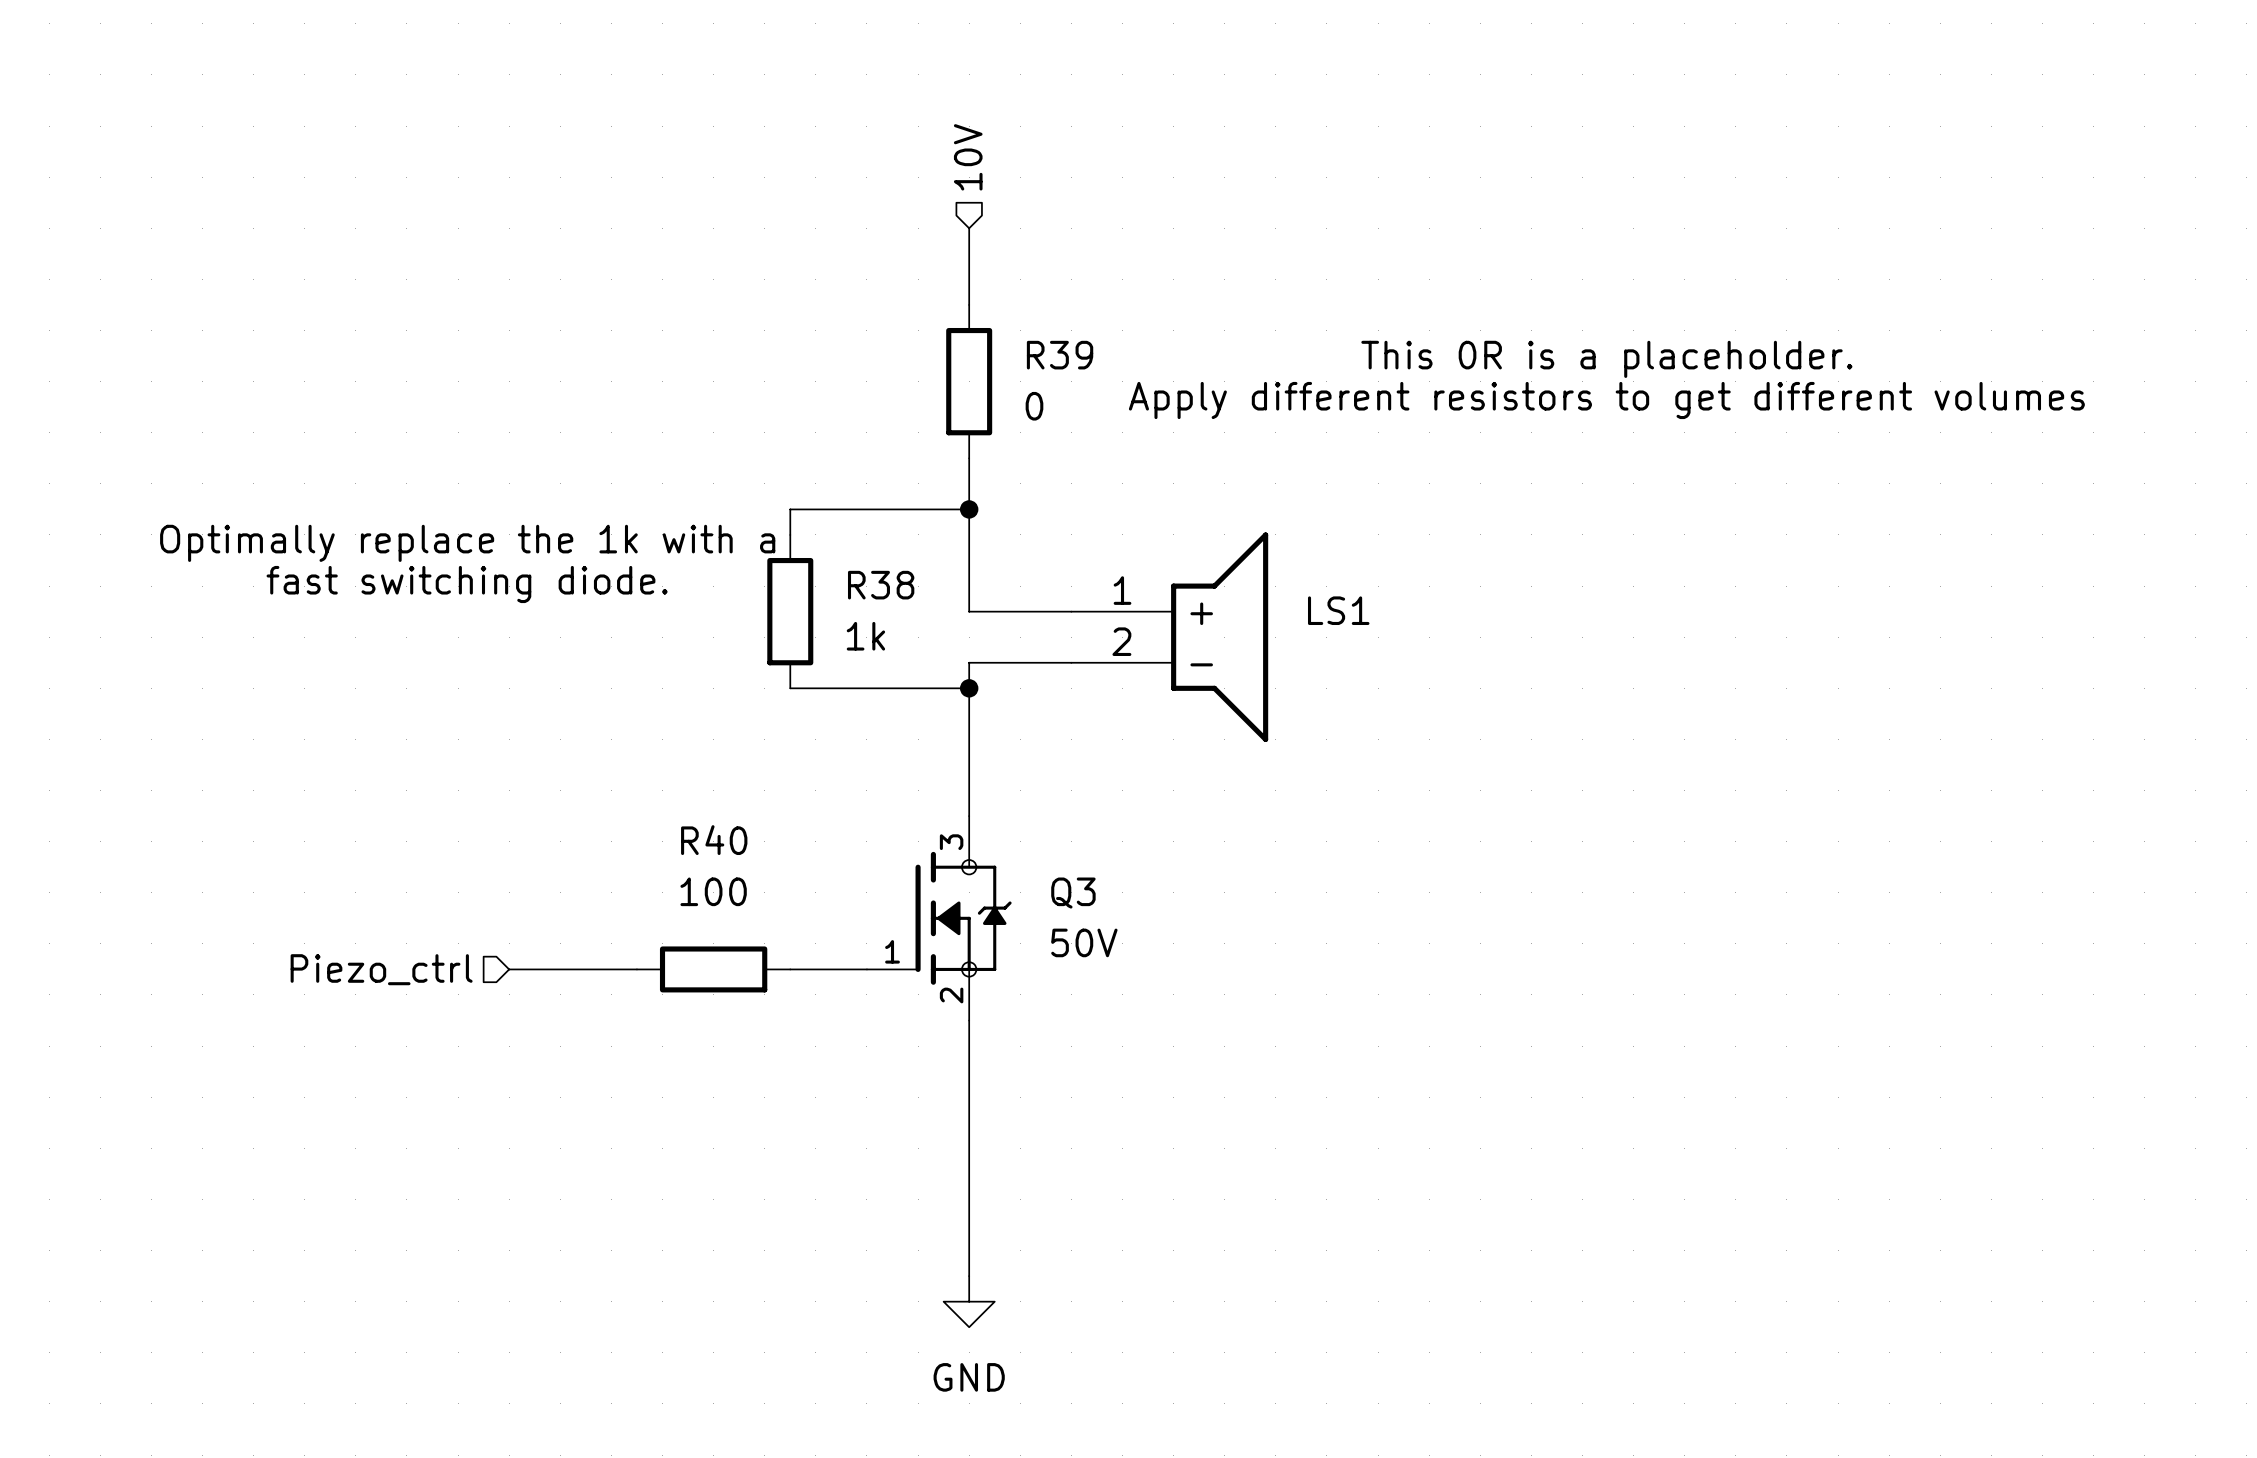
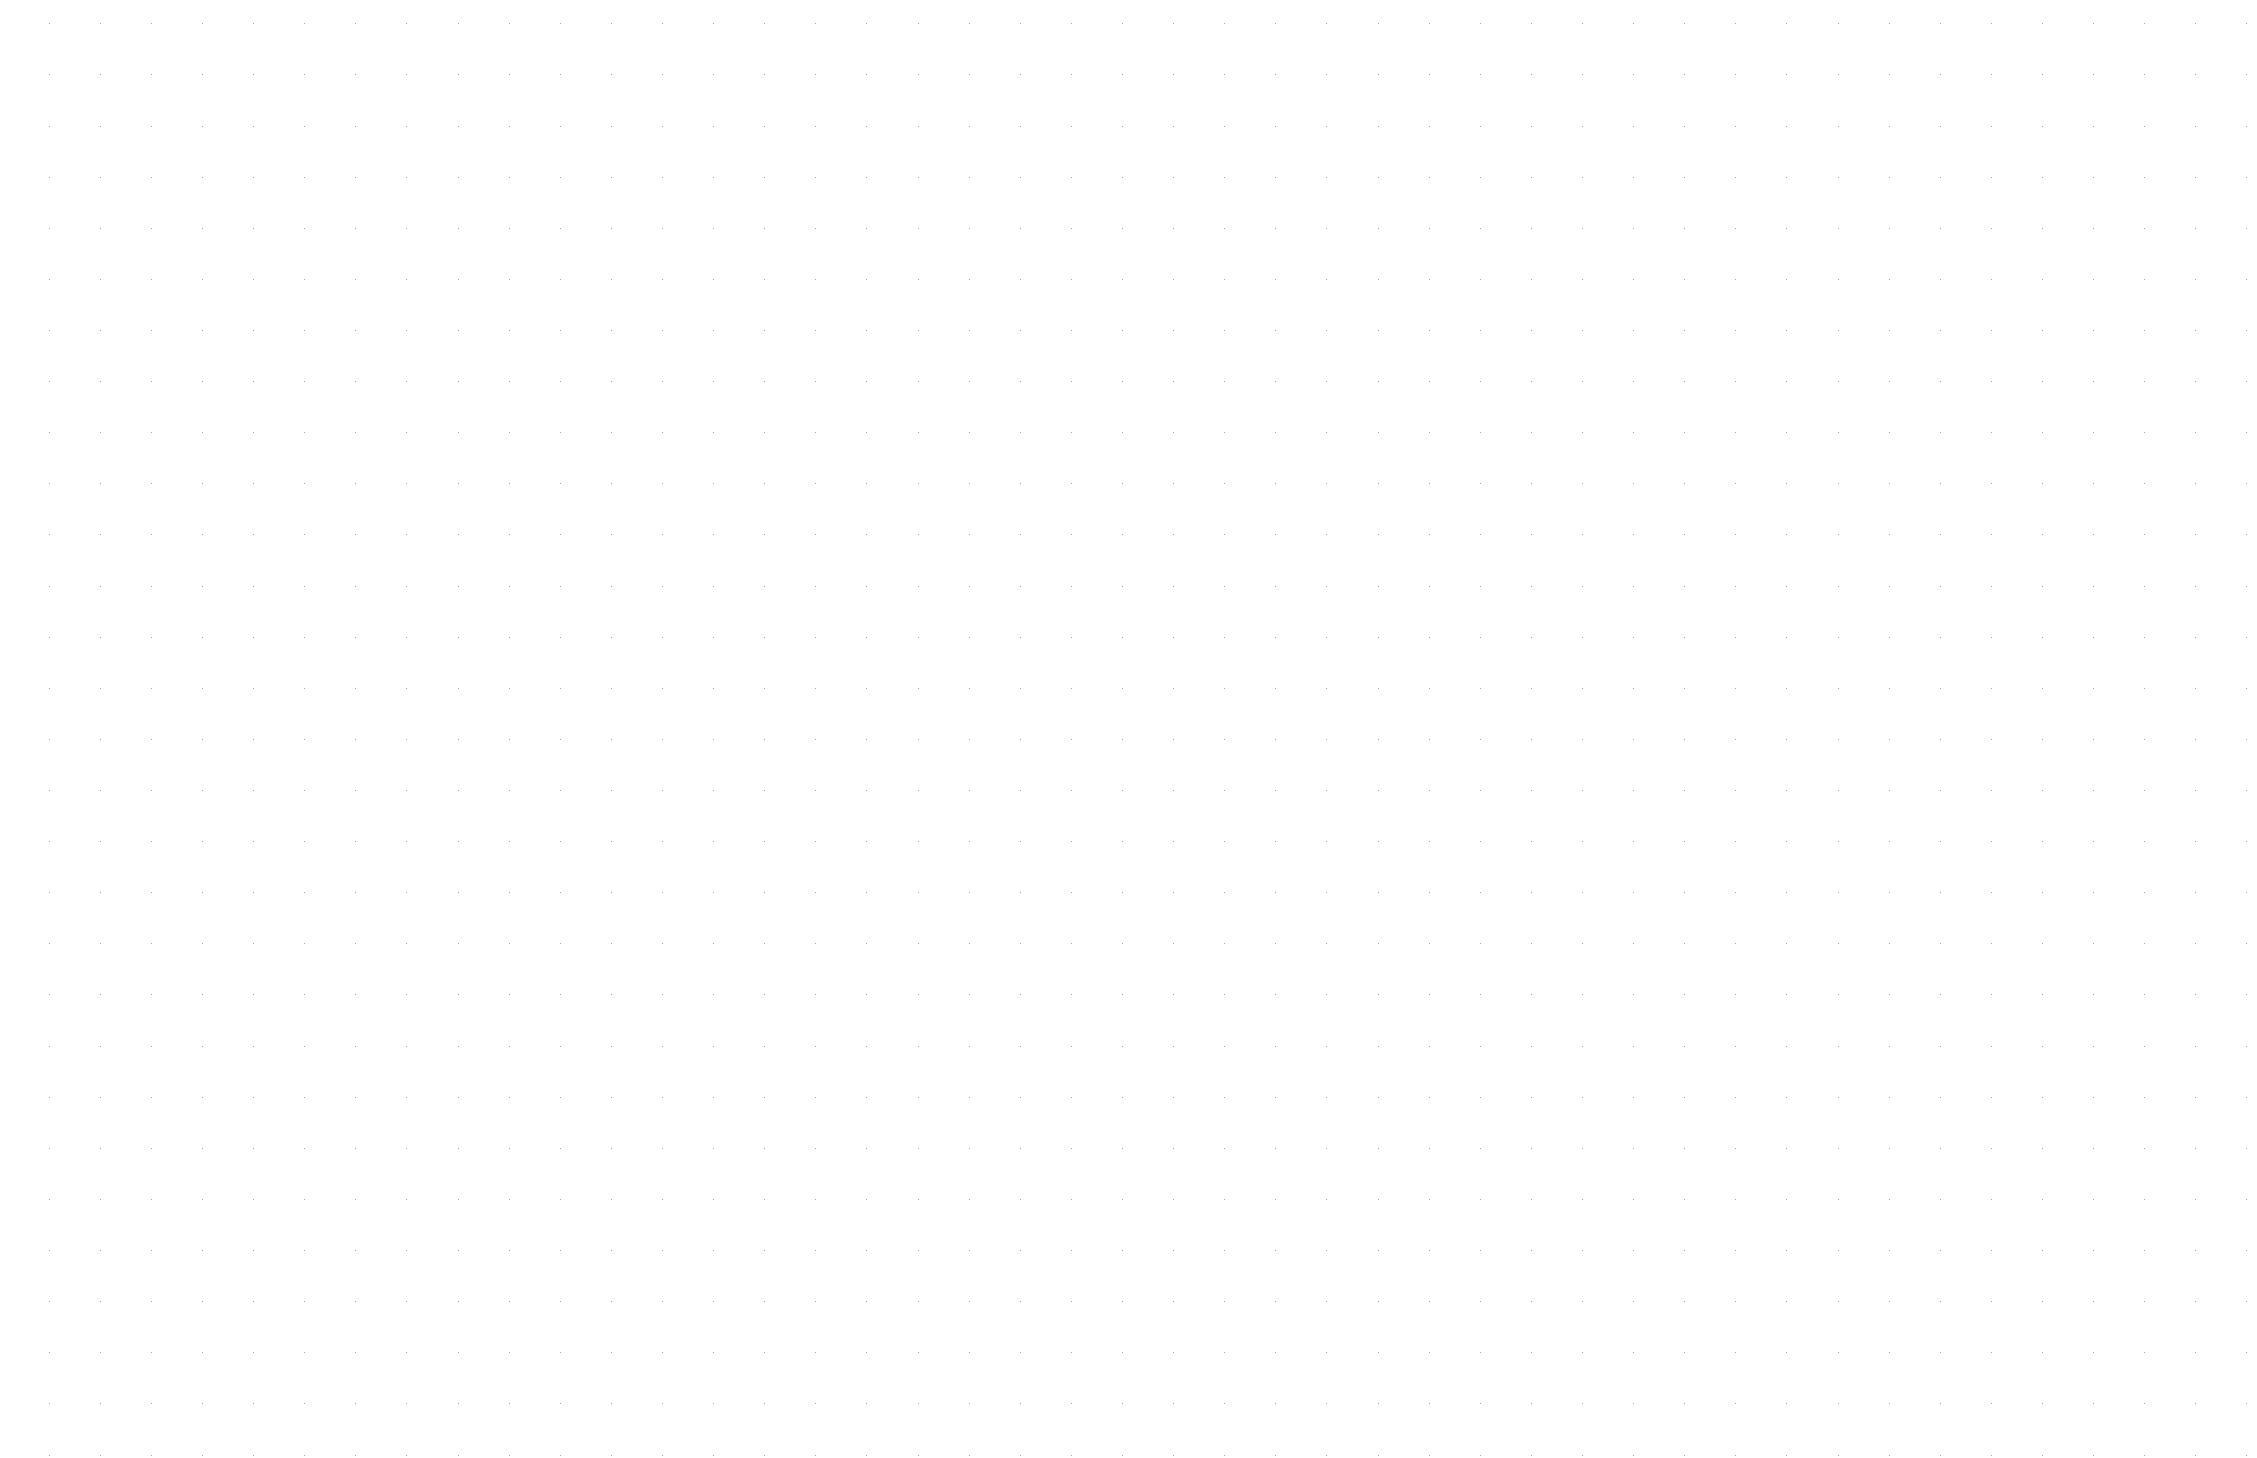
hierarchical label: 10V (968, 157) -> none
wire: (969, 228) (969, 304) -> none
text: This 0R is a placeholder. (1606, 359) -> none
R39: 0 (969, 381) -> none
text: Apply different resistors to get different volumes (1606, 400) -> none
wire: (969, 458) (969, 611) (1071, 611) -> none
wire: (969, 509) (790, 509) (790, 534) -> none
junction: (969, 509) -> none
text: Optimally replace the 1k with a (467, 543) -> none
text: fast switching diode. (467, 584) -> none
R38: 1k (790, 611) -> none
LS1: (1169, 637) -> none
wire: (1071, 662) (969, 662) (969, 816) -> none
wire: (790, 688) (969, 688) -> none
junction: (969, 688) -> none
Q3: 50V (939, 918) -> none
hierarchical label: Piezo_ctrl (381, 969) -> none
wire: (509, 969) (636, 969) -> none
R40: 100 (713, 969) -> none
wire: (790, 969) (866, 969) -> none
wire: (969, 1020) (969, 1276) -> none
power symbol: GND (969, 1301) -> none

